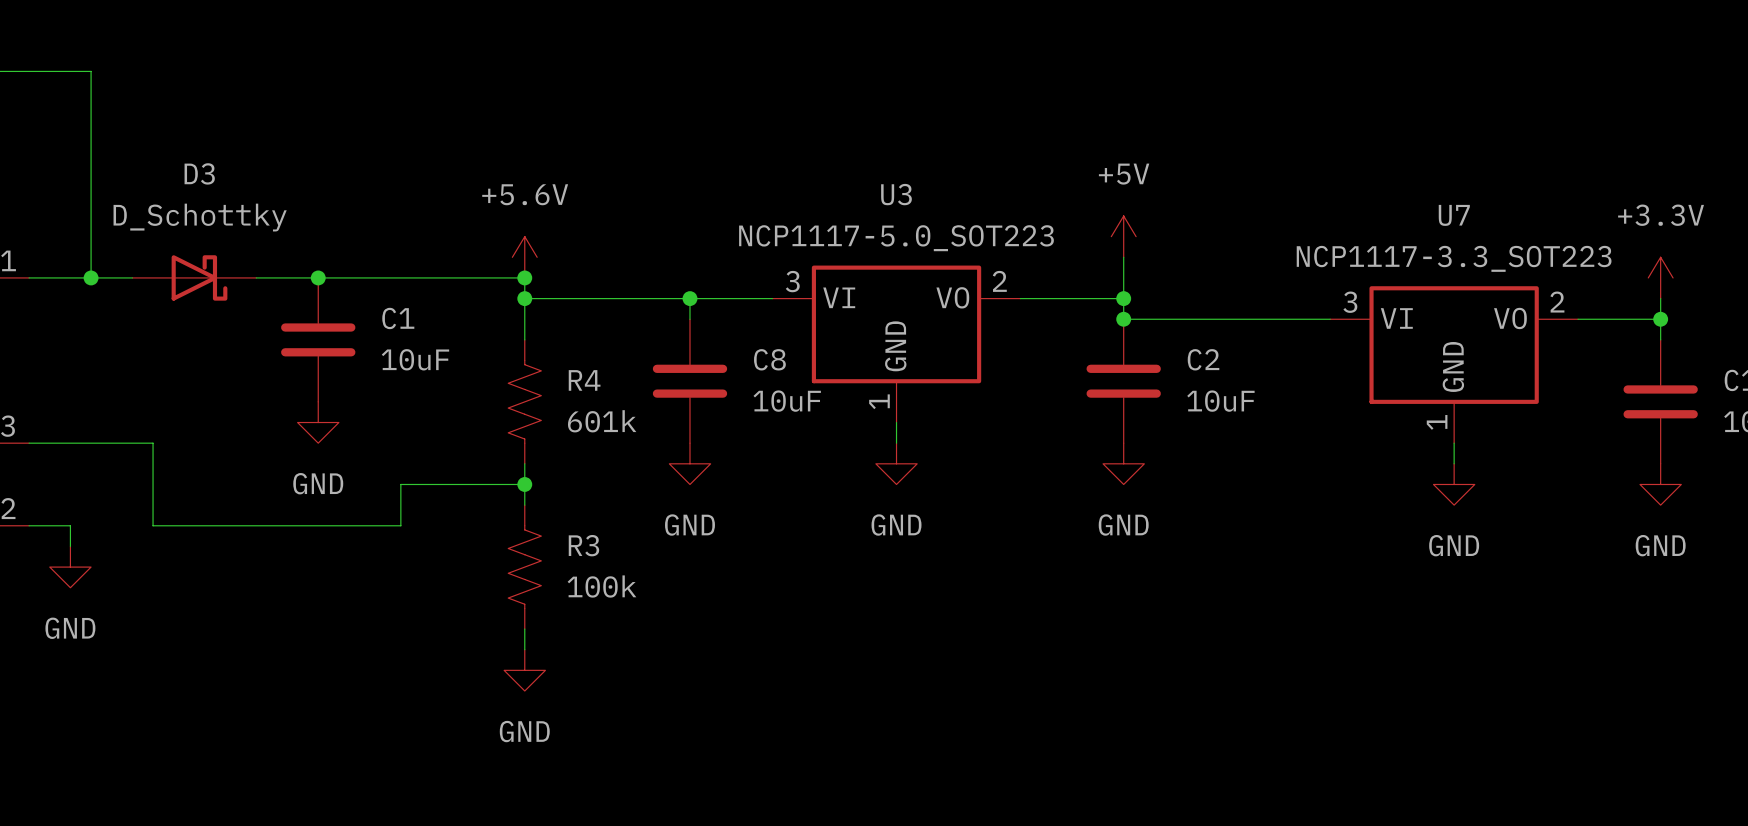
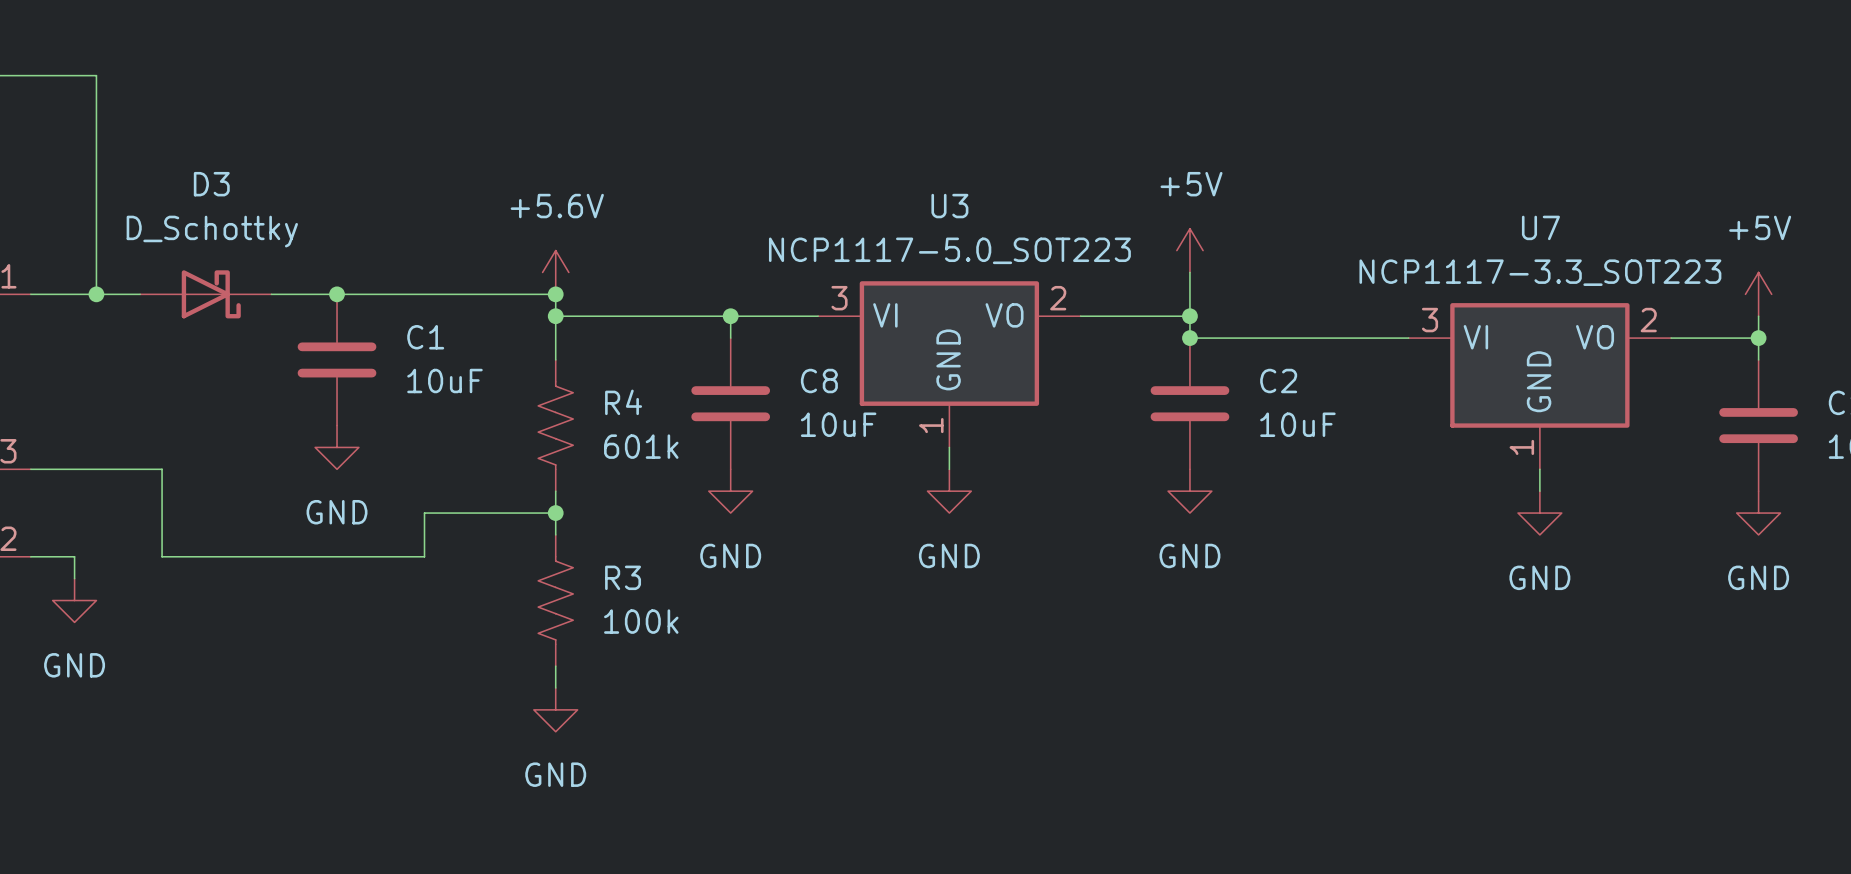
power symbol: +3.3V (1660, 277) -> +5V (1758, 294)

